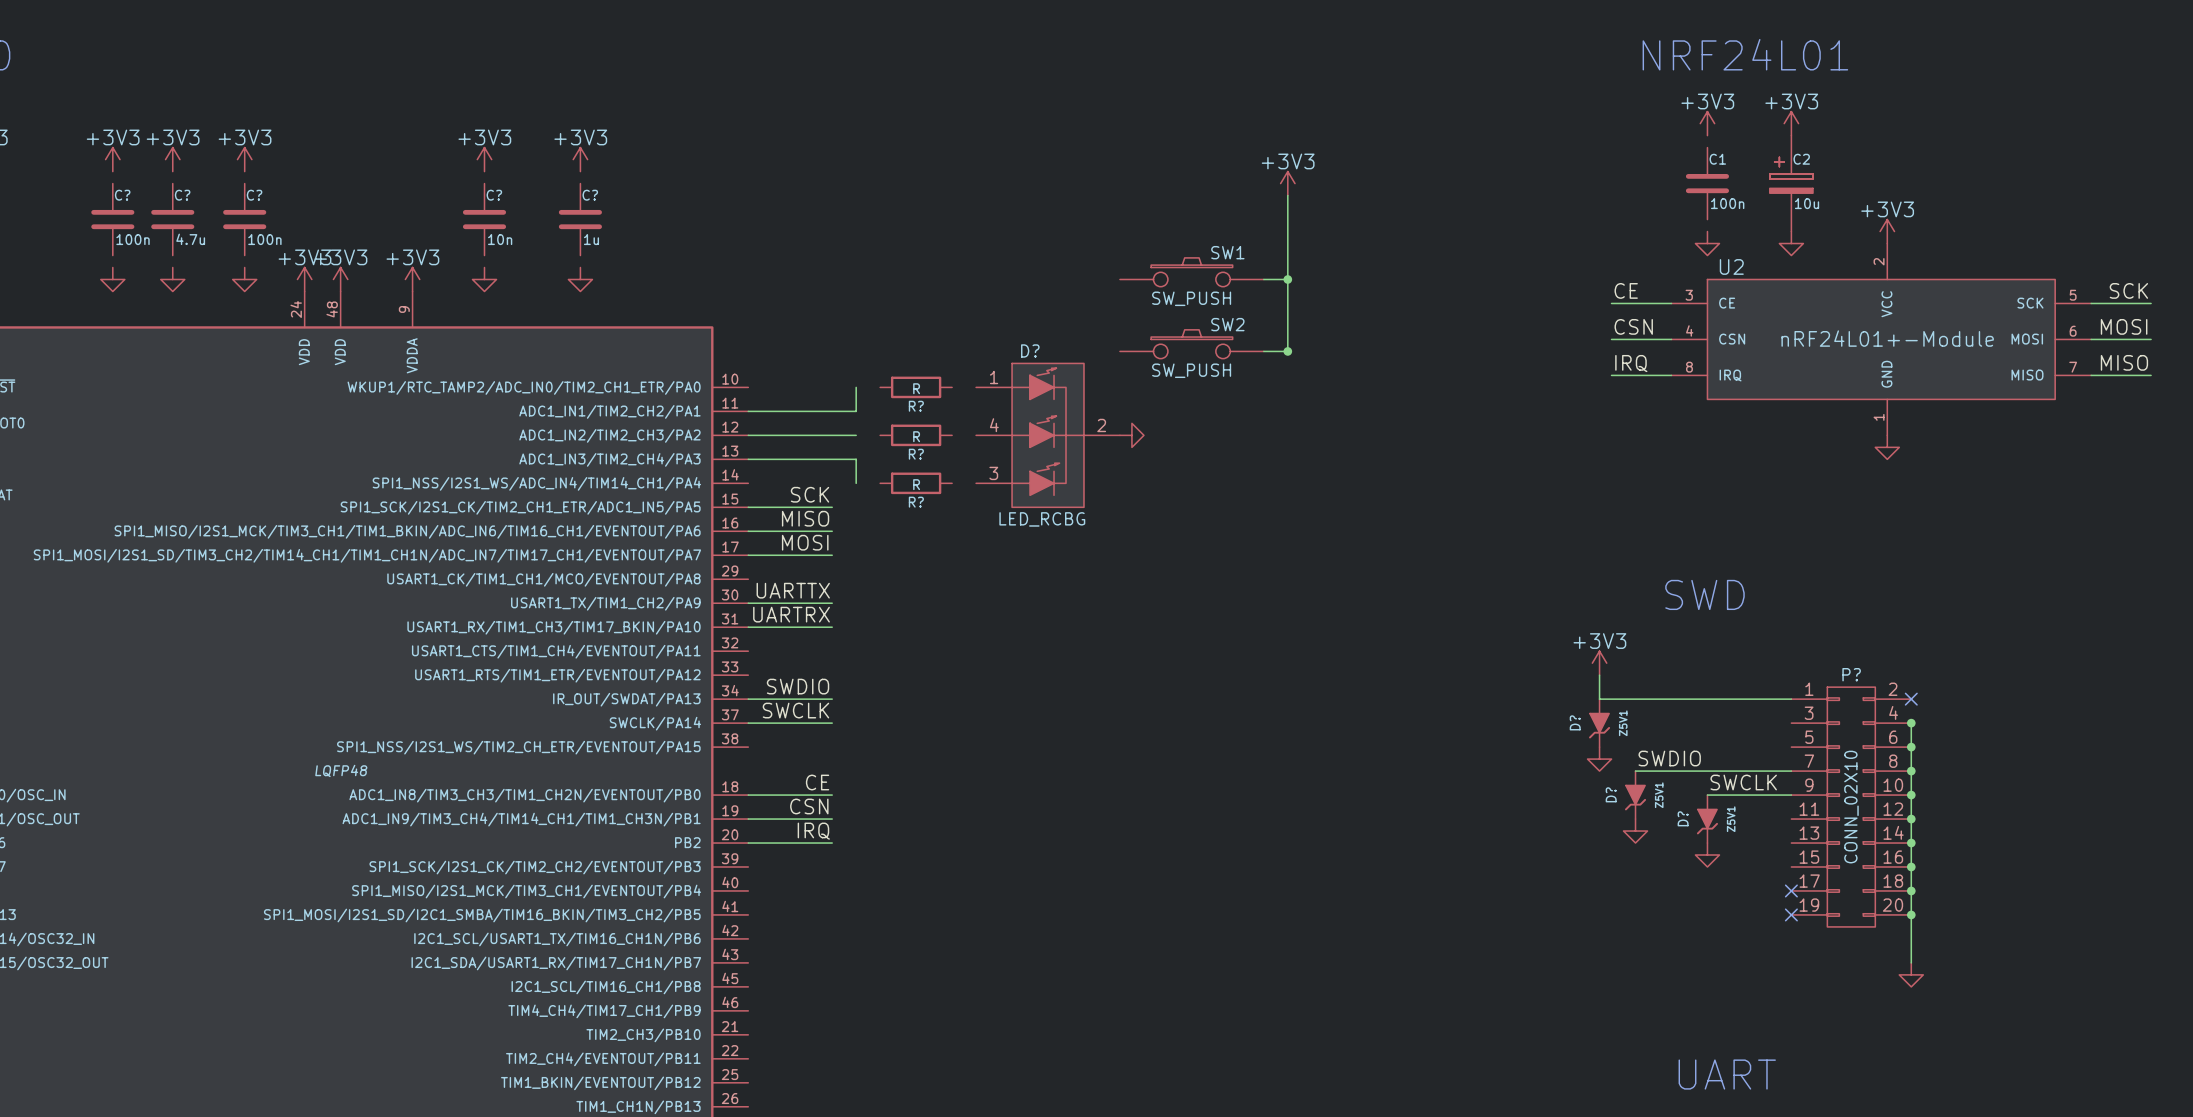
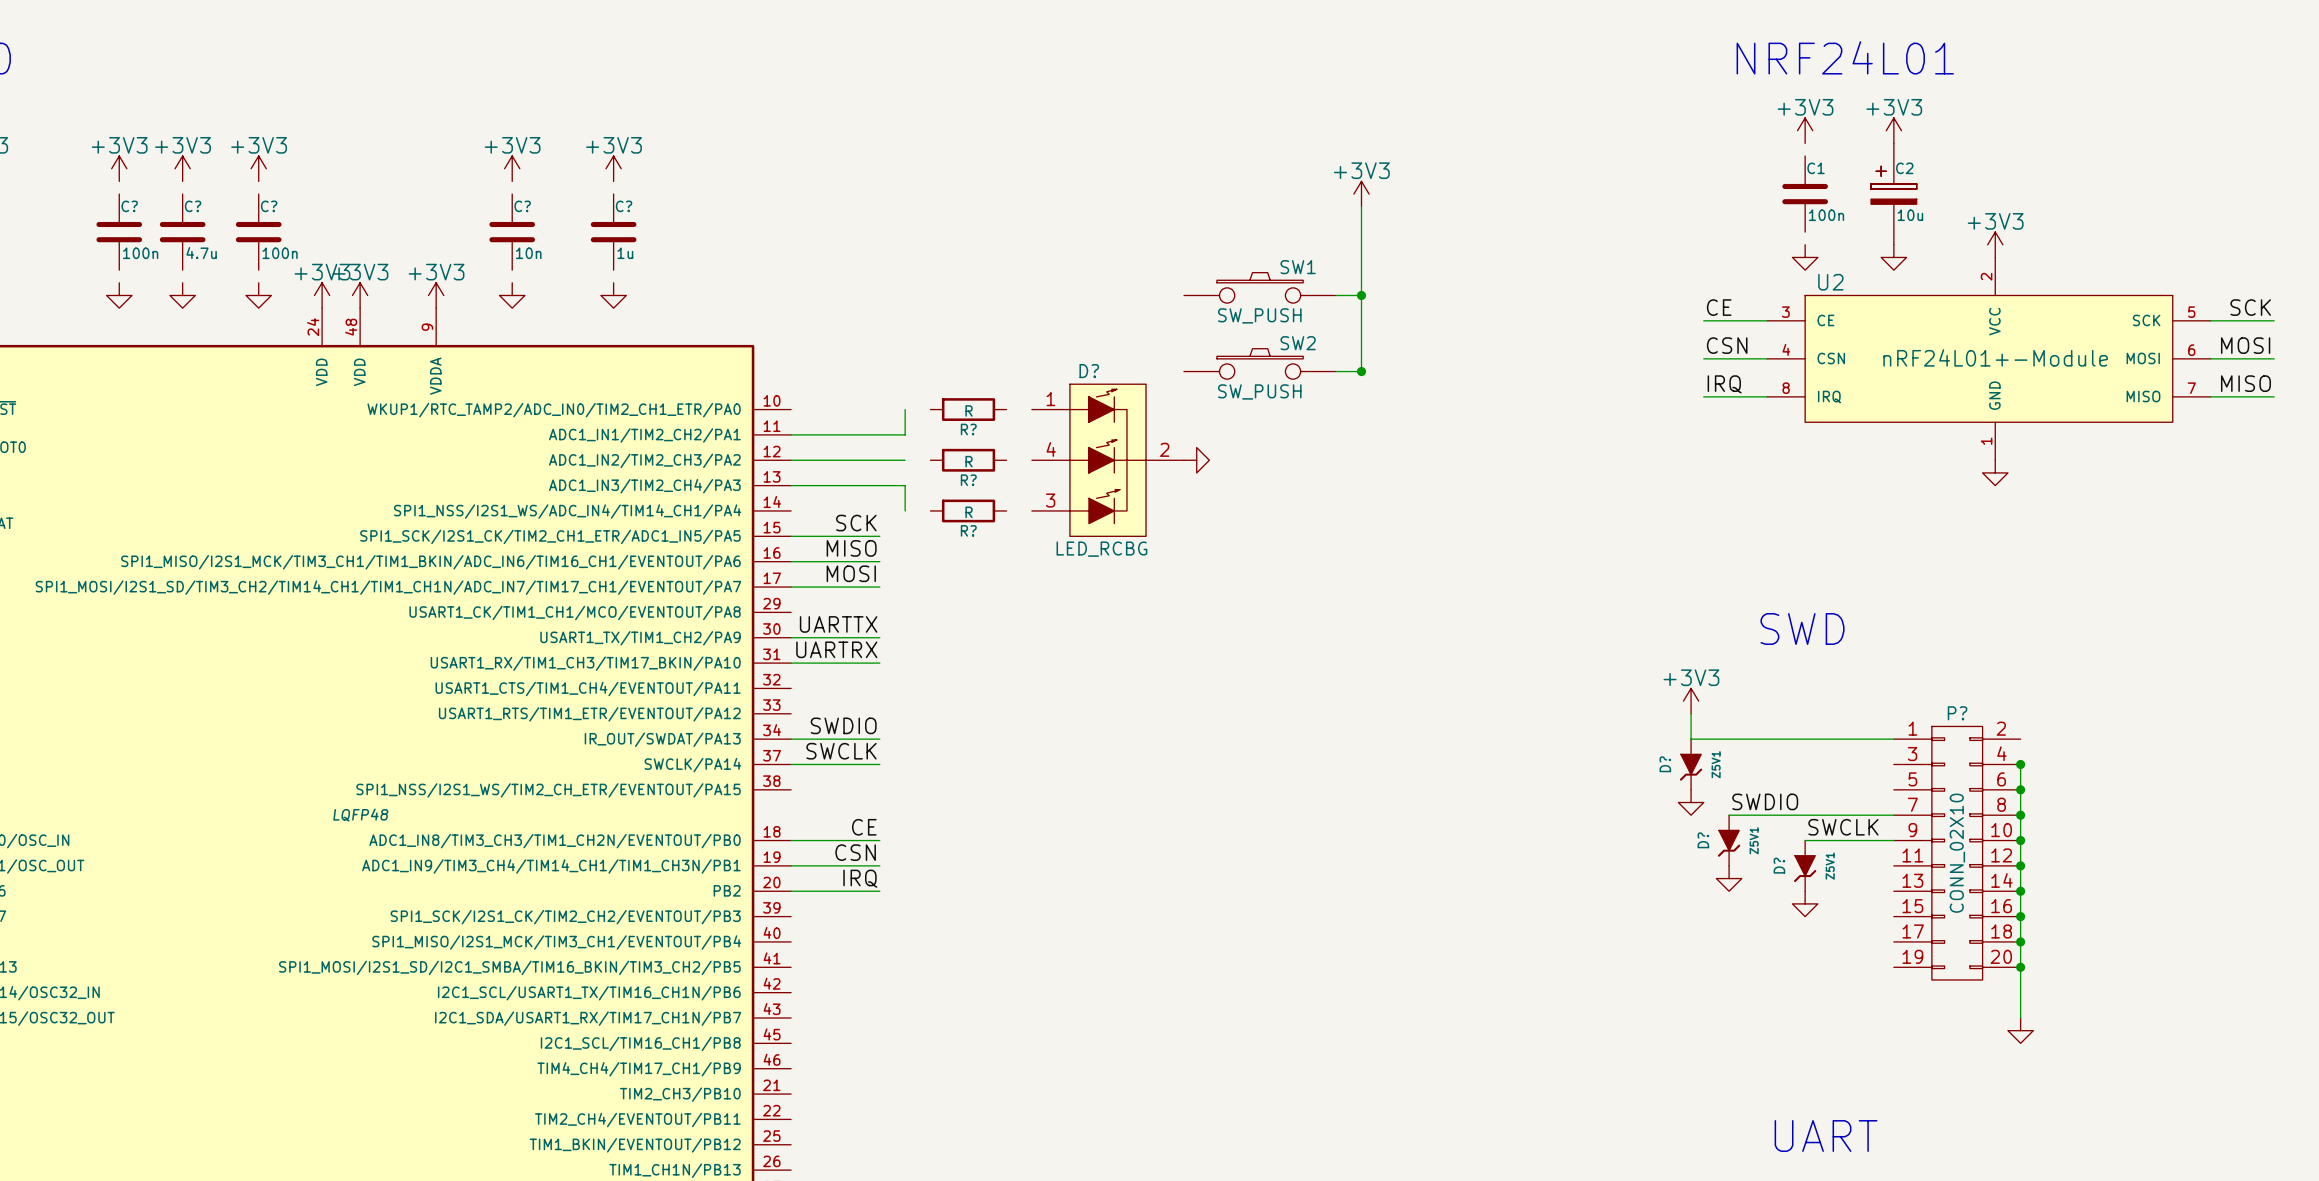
no-connect mark: (1911, 699) -> none
no-connect mark: (1791, 890) -> none
no-connect mark: (1791, 914) -> none

